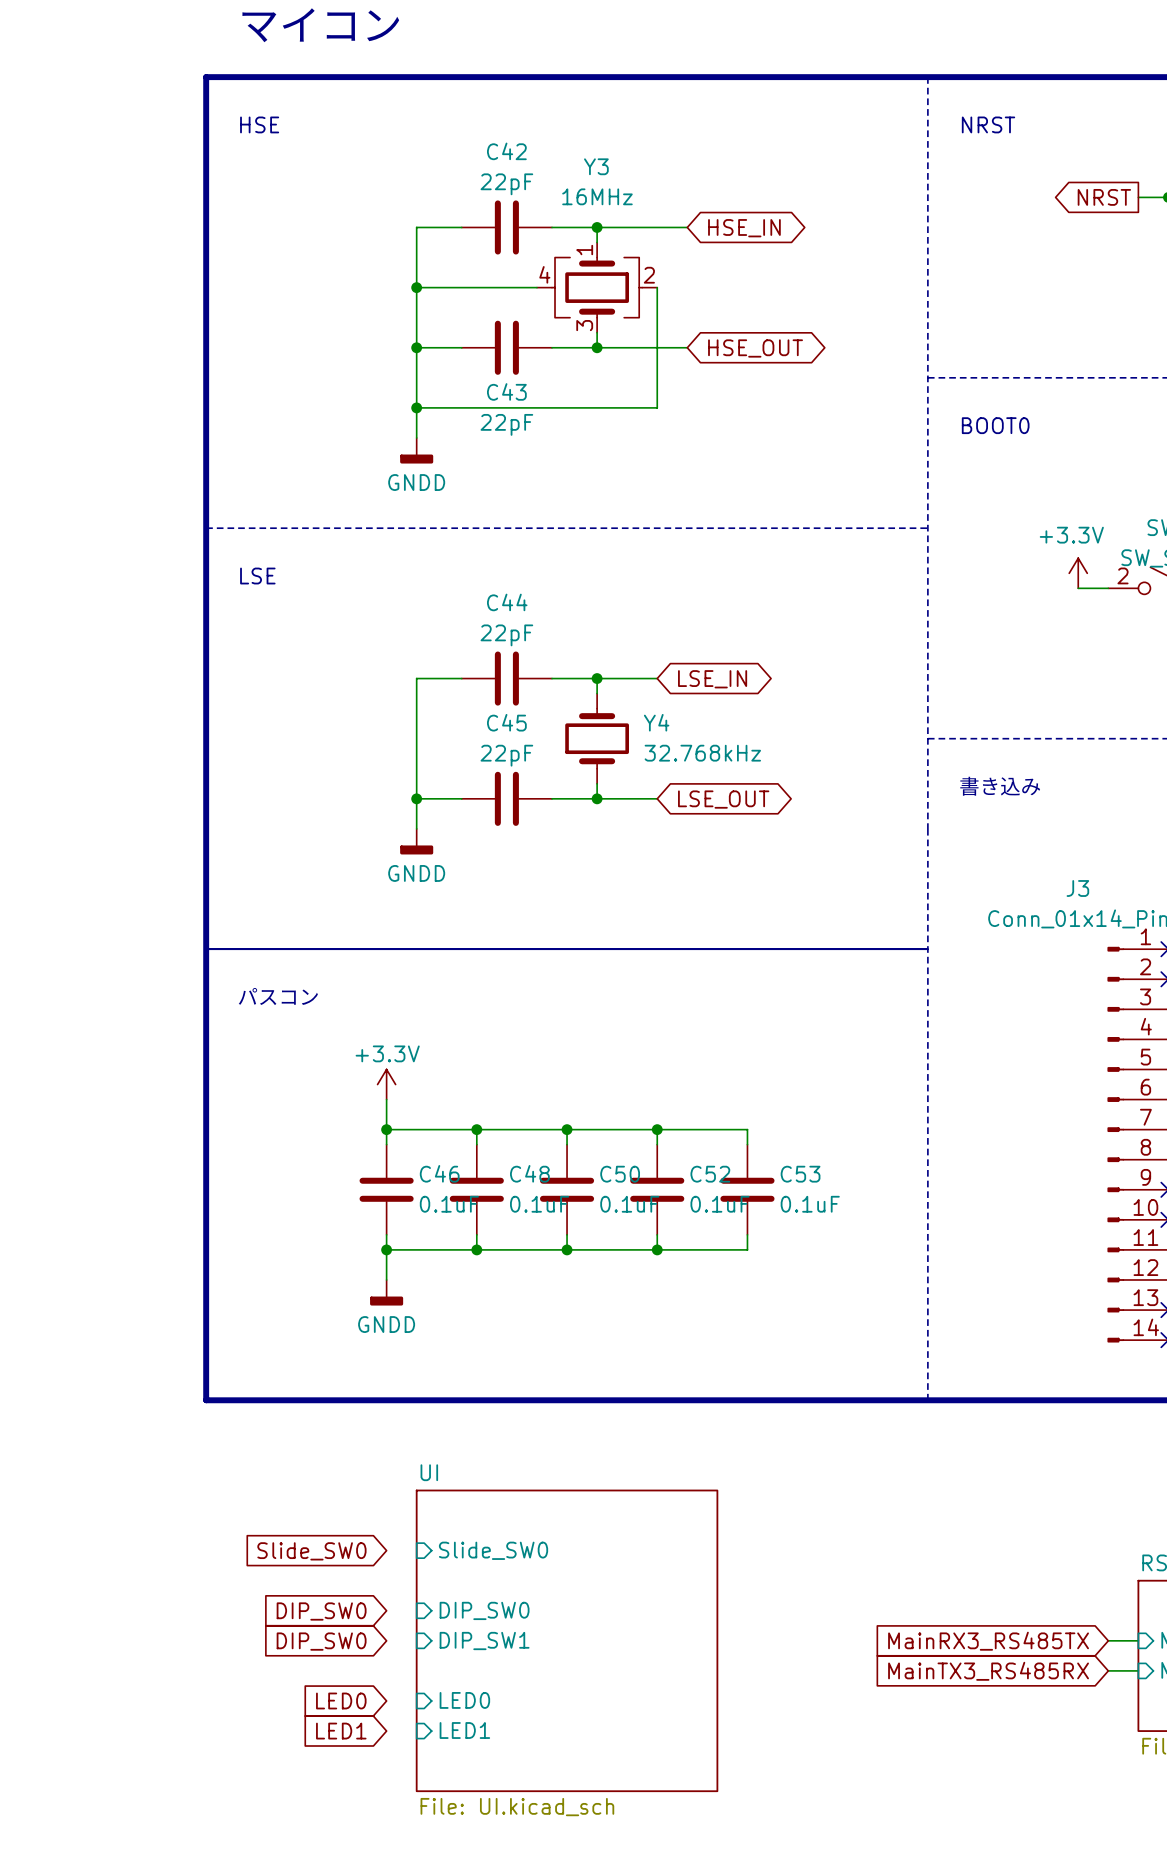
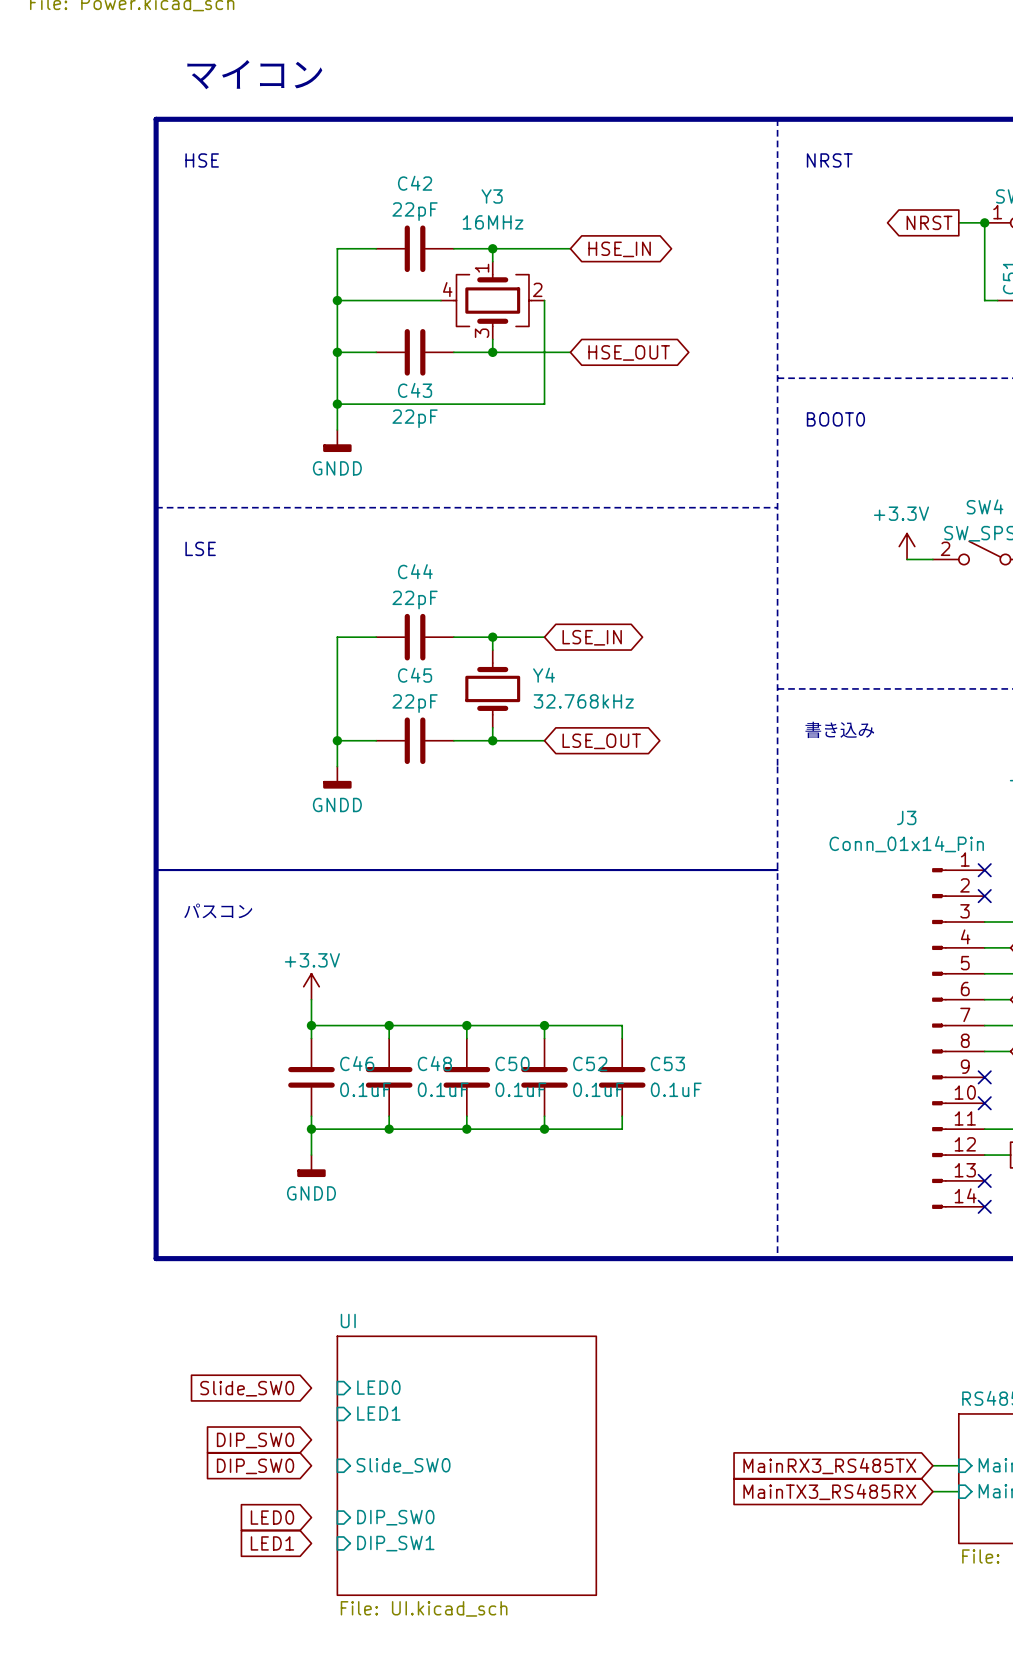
sheet pin: Slide_SW0 (493, 1550) -> LED0 (378, 1387)
sheet pin: none -> LED1 (378, 1413)
sheet pin: DIP_SW0 (484, 1610) -> none
sheet pin: DIP_SW1 (484, 1641) -> Slide_SW0 (403, 1465)
sheet pin: LED0 (464, 1700) -> DIP_SW0 (395, 1517)
sheet pin: LED1 (464, 1730) -> DIP_SW1 (395, 1543)

